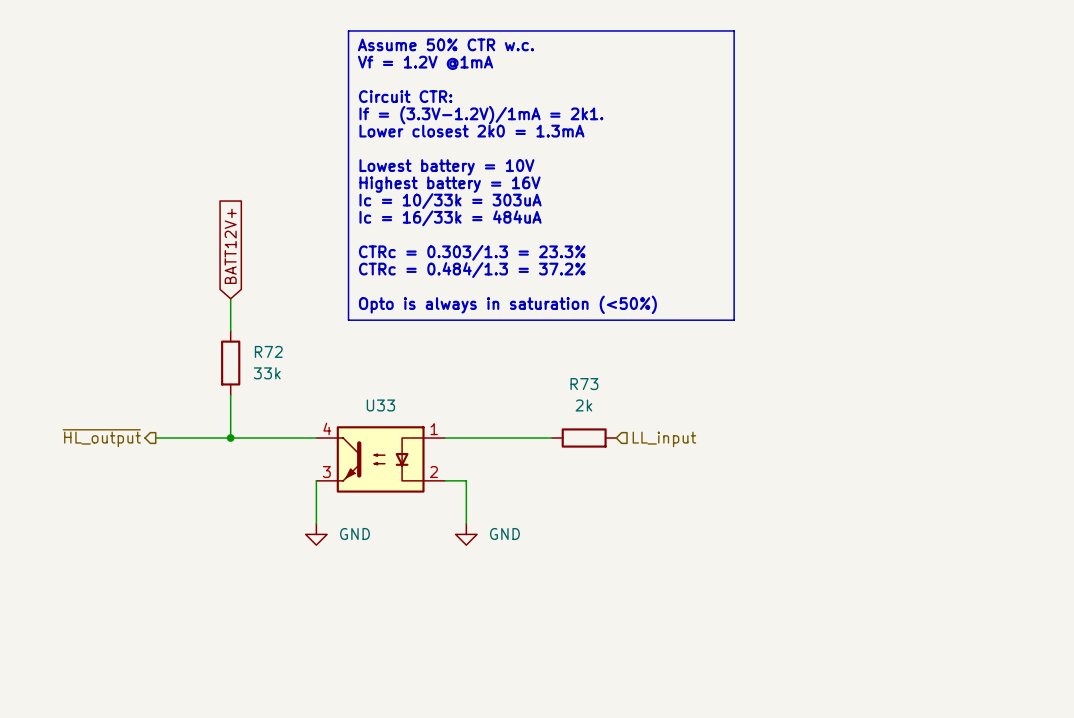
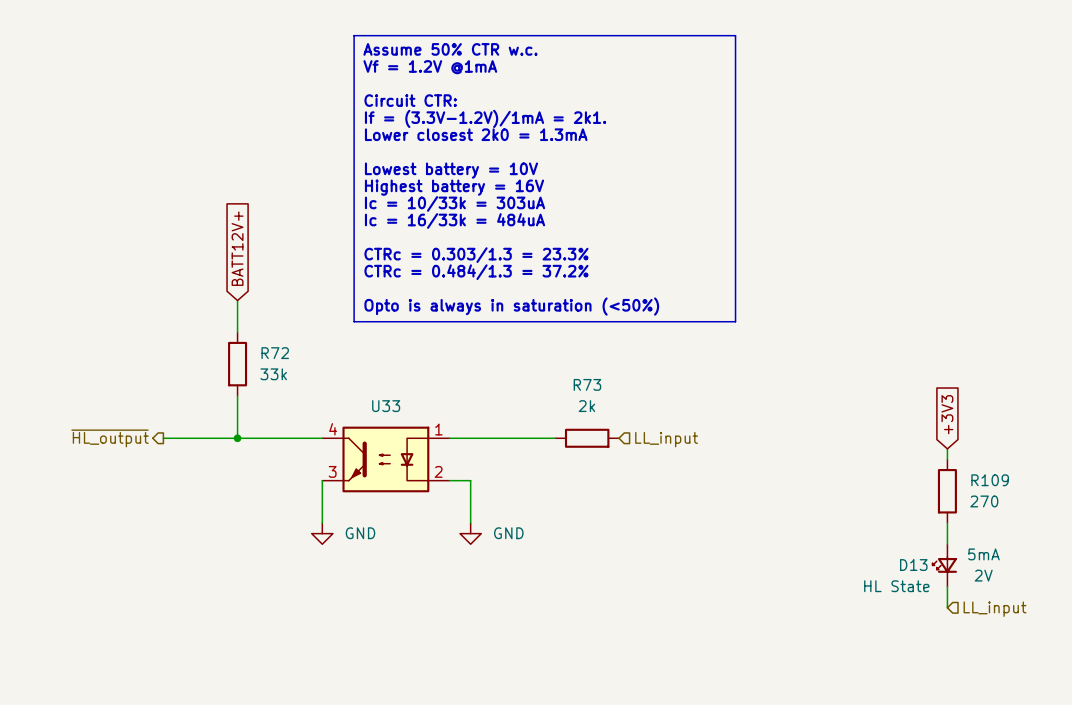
global label: none -> +3V3 (947, 414)
wire: none -> (947, 448) (947, 459)
R109: none -> 270 (947, 491)
wire: none -> (947, 523) (947, 544)
D13: none -> HL State (944, 565)
wire: none -> (947, 586) (947, 607)
hierarchical label: none -> LL_input (995, 609)

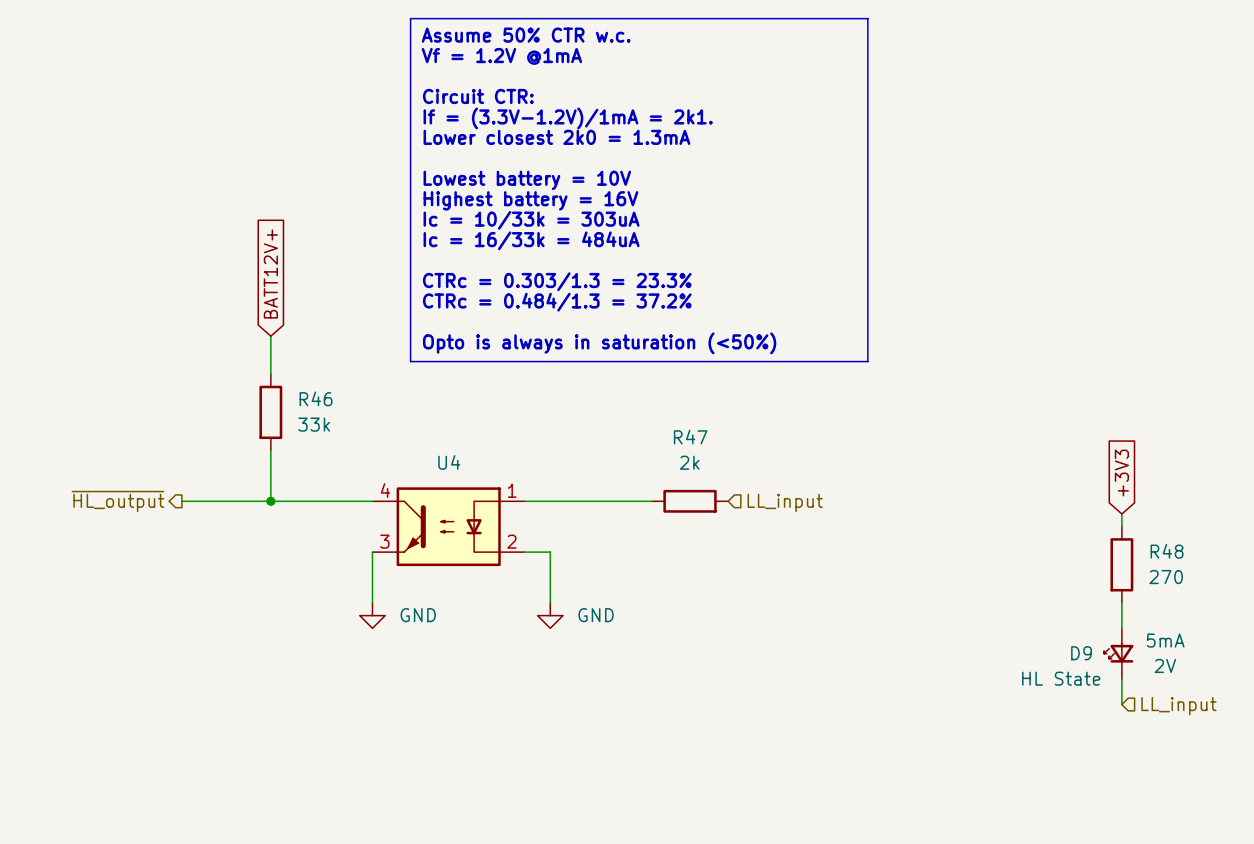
R72 name: R72 (275, 353) -> R46 (316, 398)
R73 name: R73 (587, 384) -> R47 (690, 437)
U33 name: U33 (386, 406) -> U4 (449, 462)
R109 name: R109 (990, 480) -> R48 (1167, 551)
D13 name: D13 (913, 565) -> D9 (1081, 653)

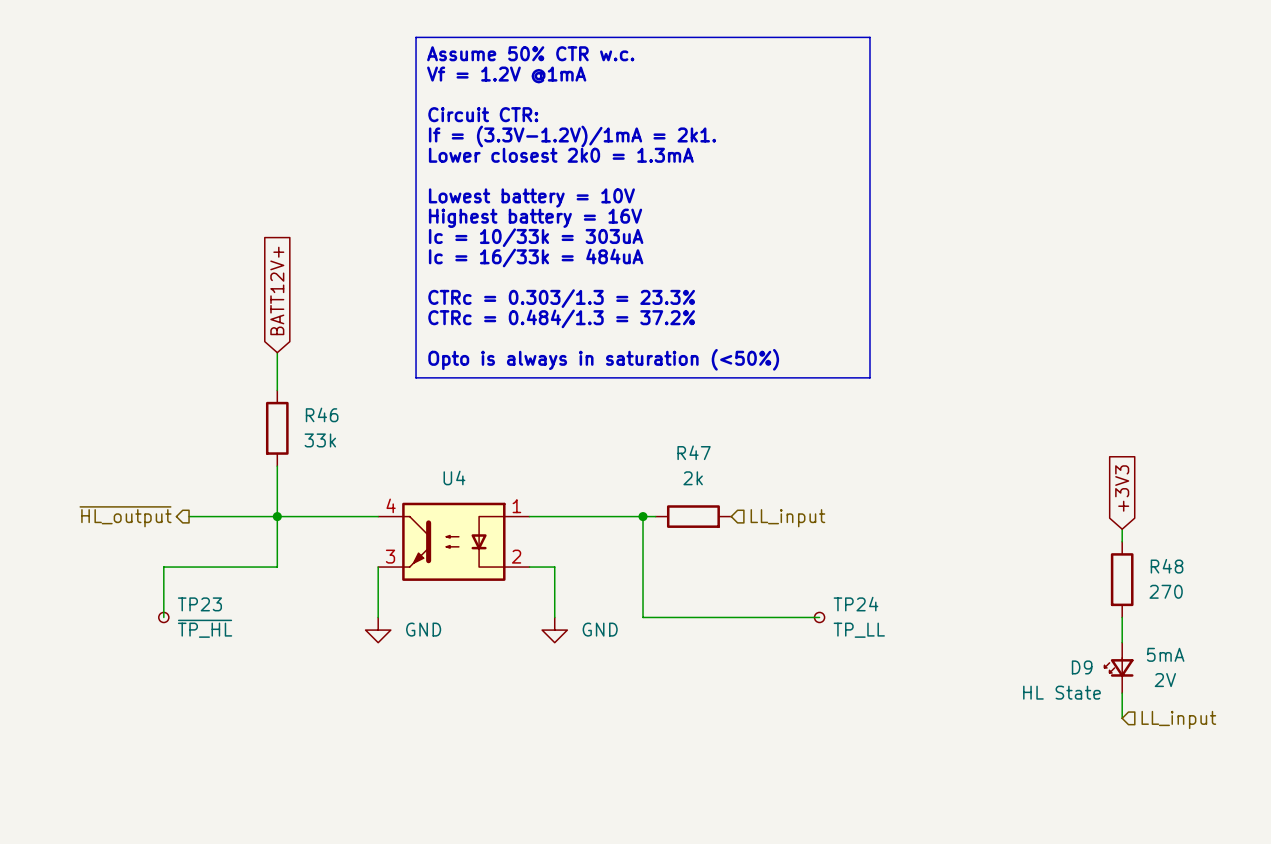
wire: none -> (277, 516) (277, 567) (163, 567) (163, 617)
wire: none -> (643, 516) (643, 617) (819, 617)
junction: none -> (643, 516)
TP23: none -> ~{TP_HL} (163, 617)
TP24: none -> TP_LL (819, 617)

